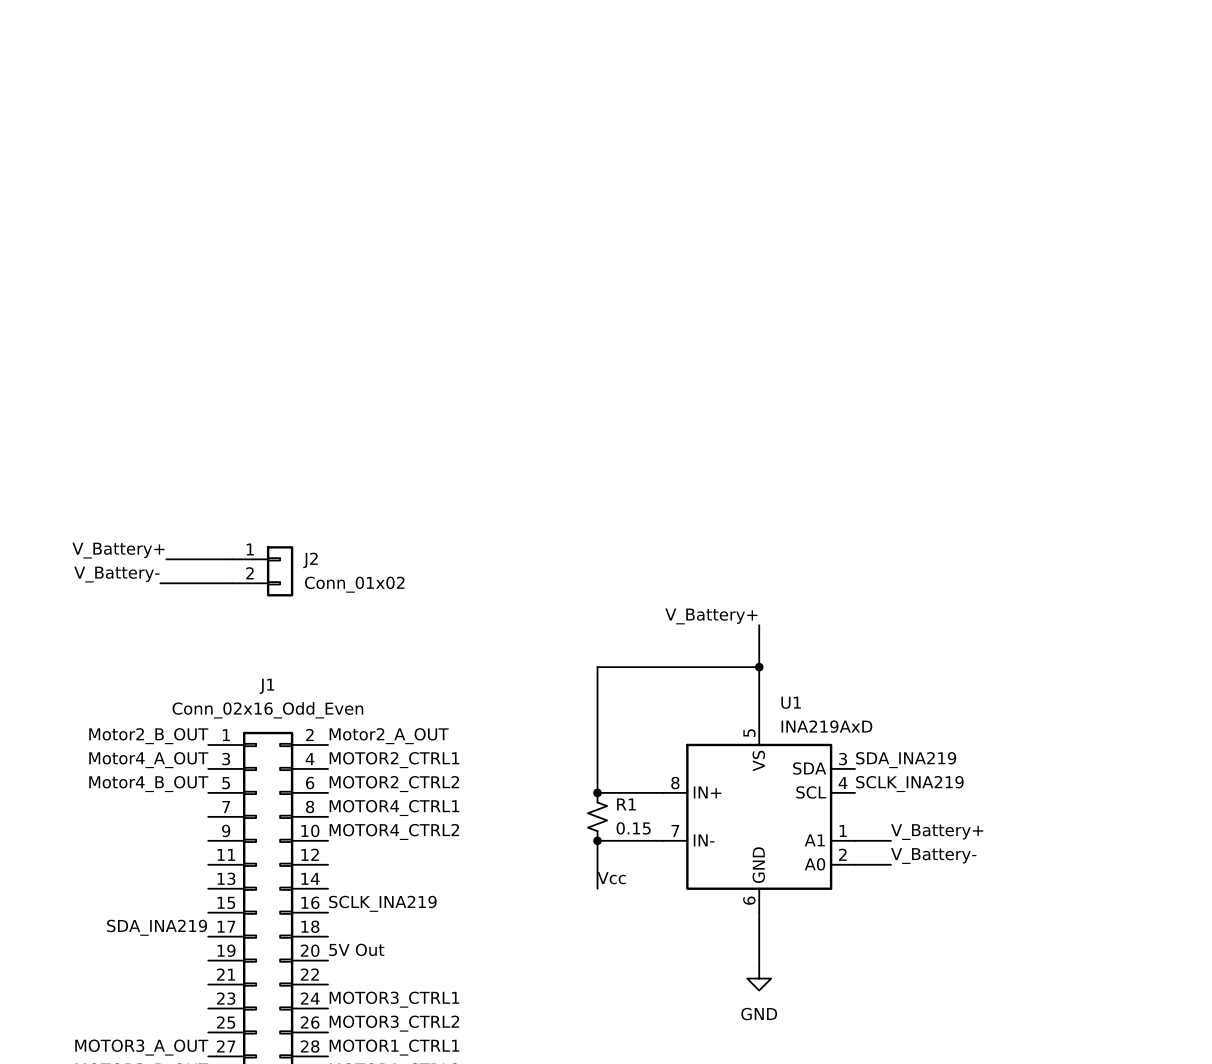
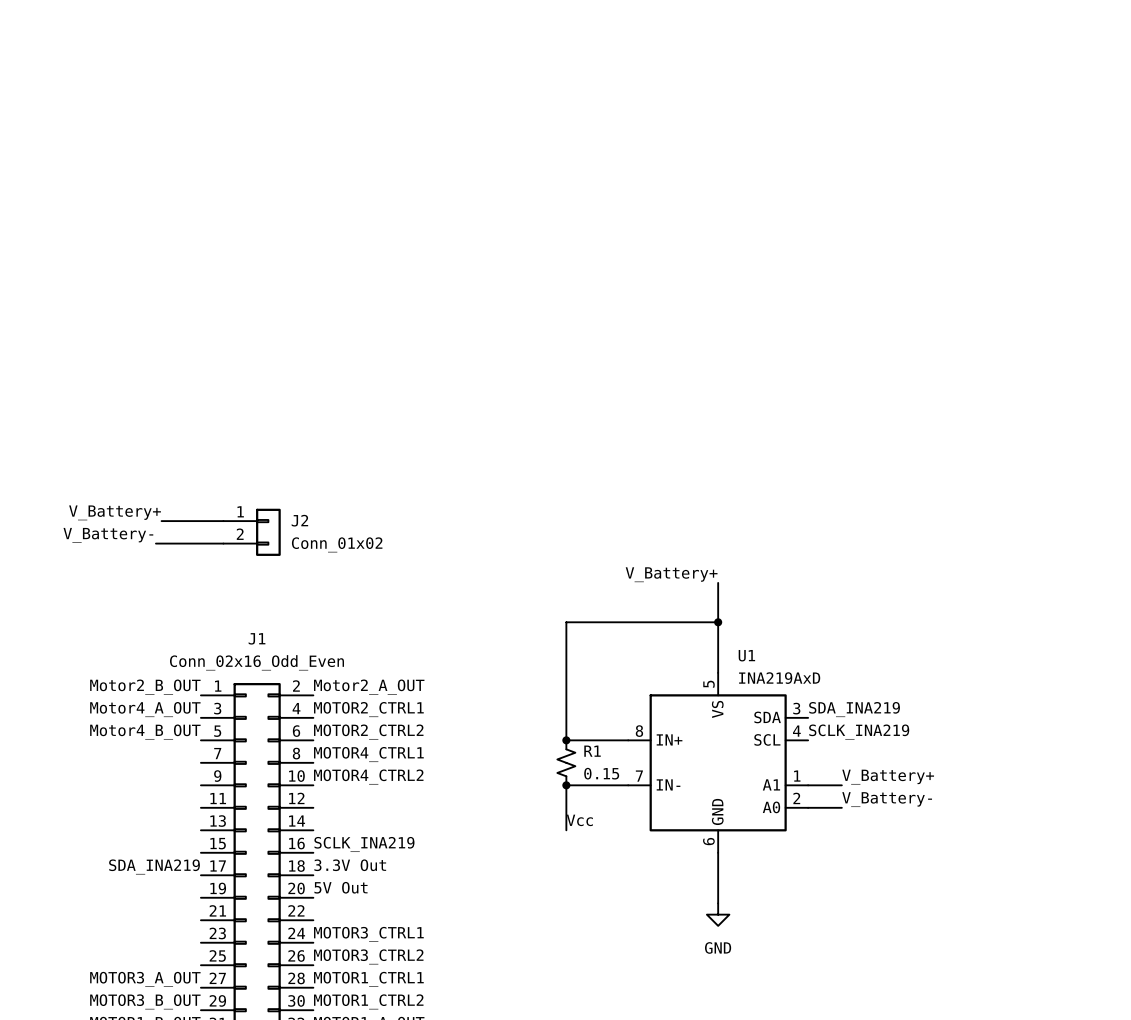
label: none -> 3.3V Out (350, 865)

